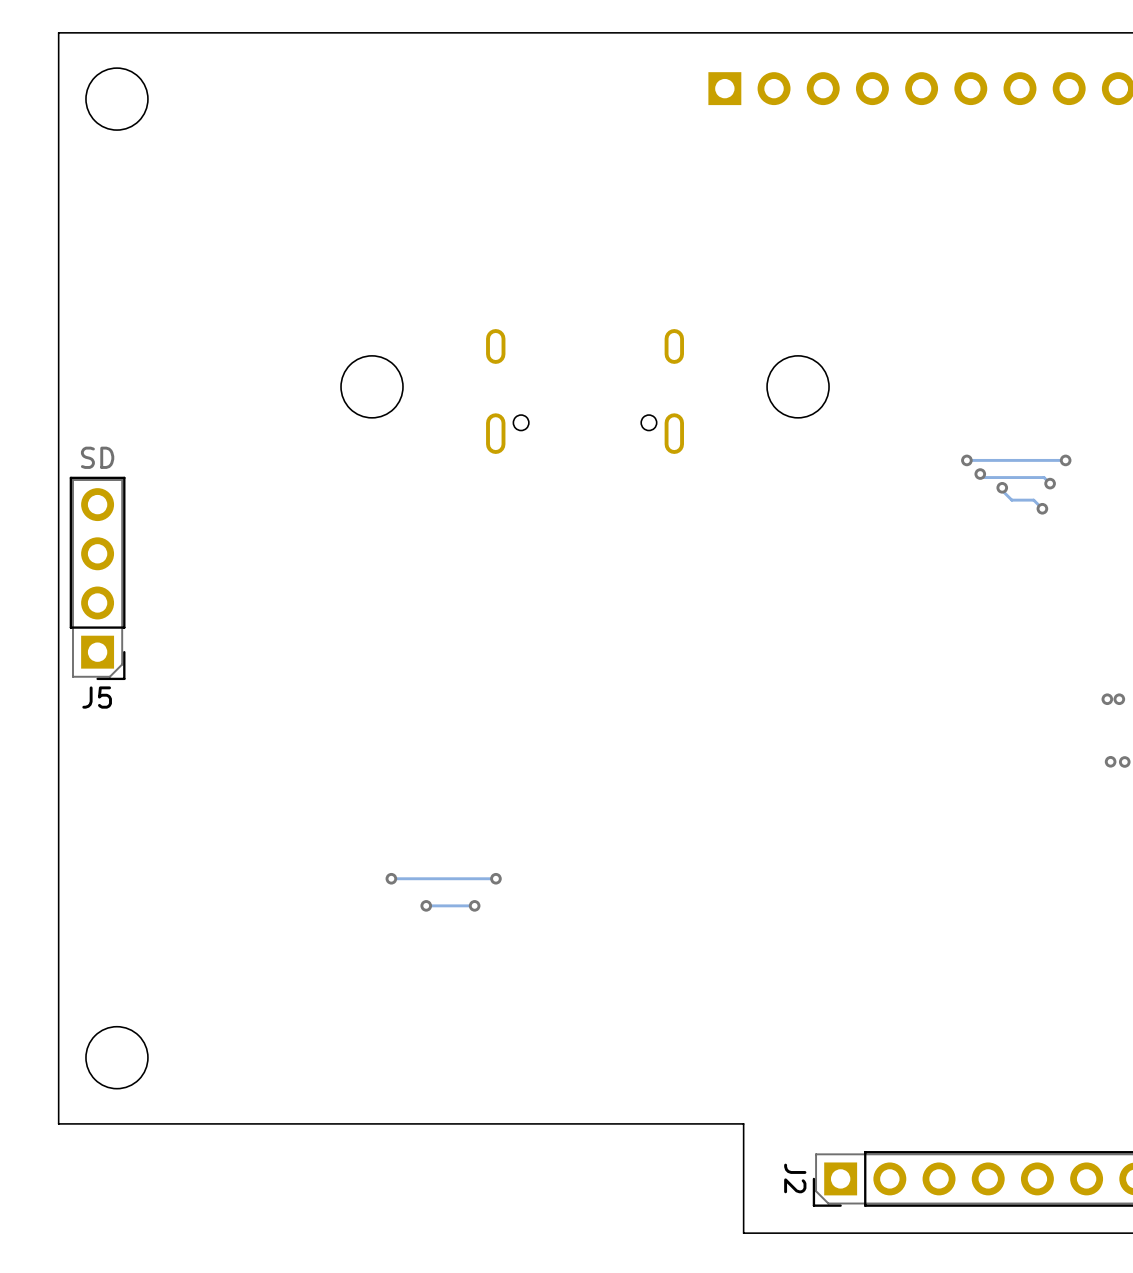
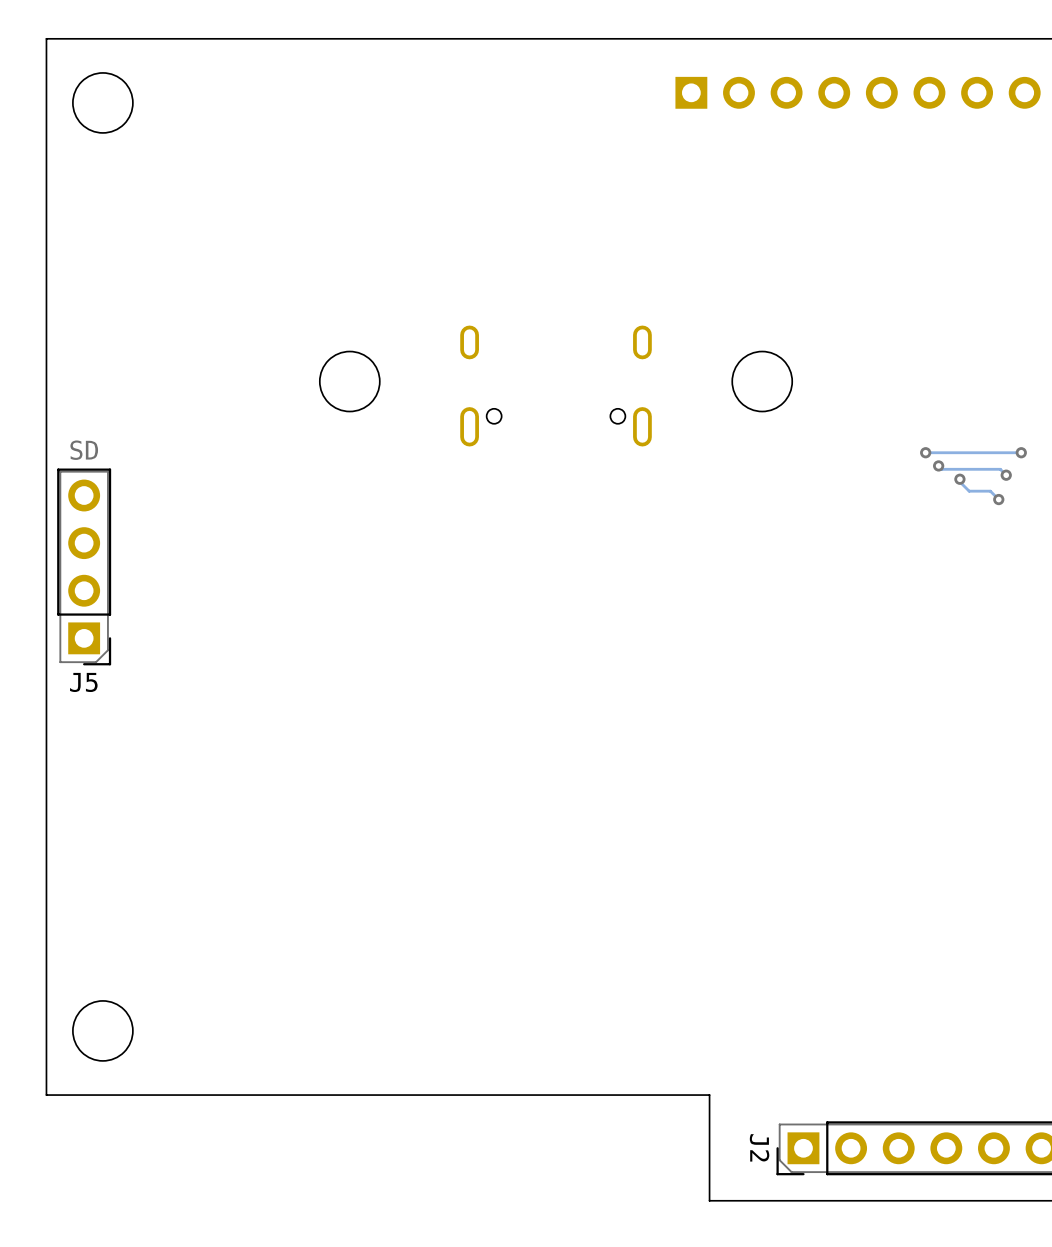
via: (391, 878) -> none
track: (495, 878) (391, 878) -> none
via: (495, 878) -> none
via: (426, 905) -> none
track: (474, 905) (426, 905) -> none
via: (474, 905) -> none

